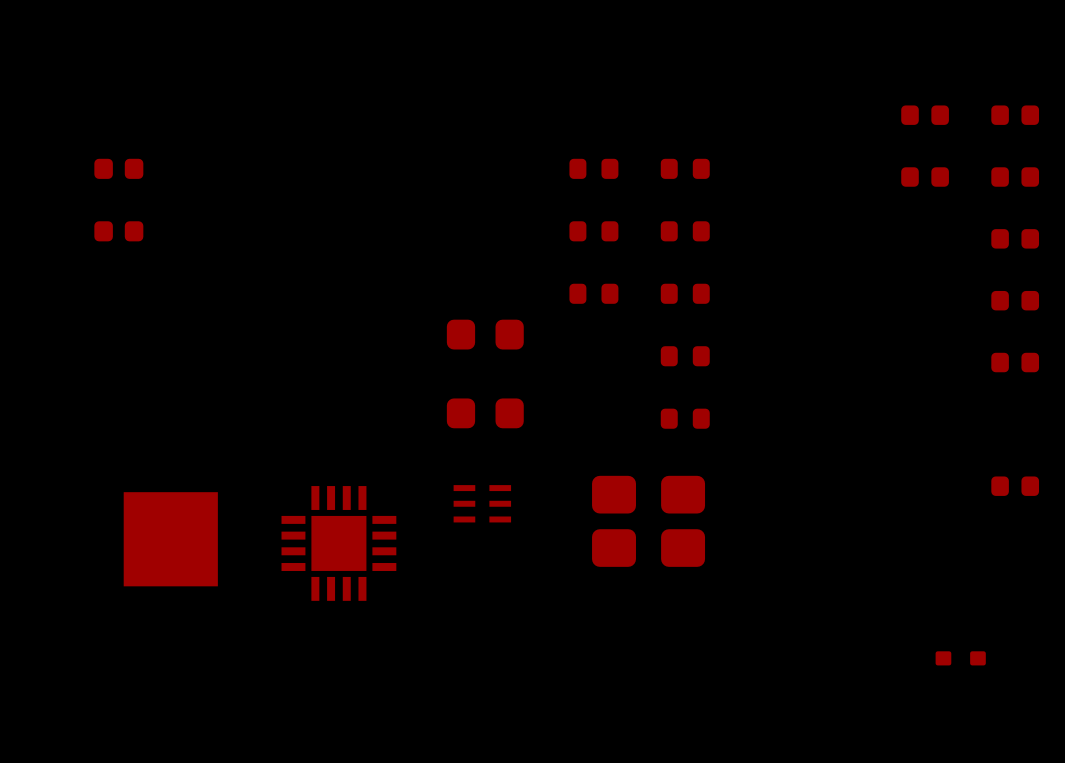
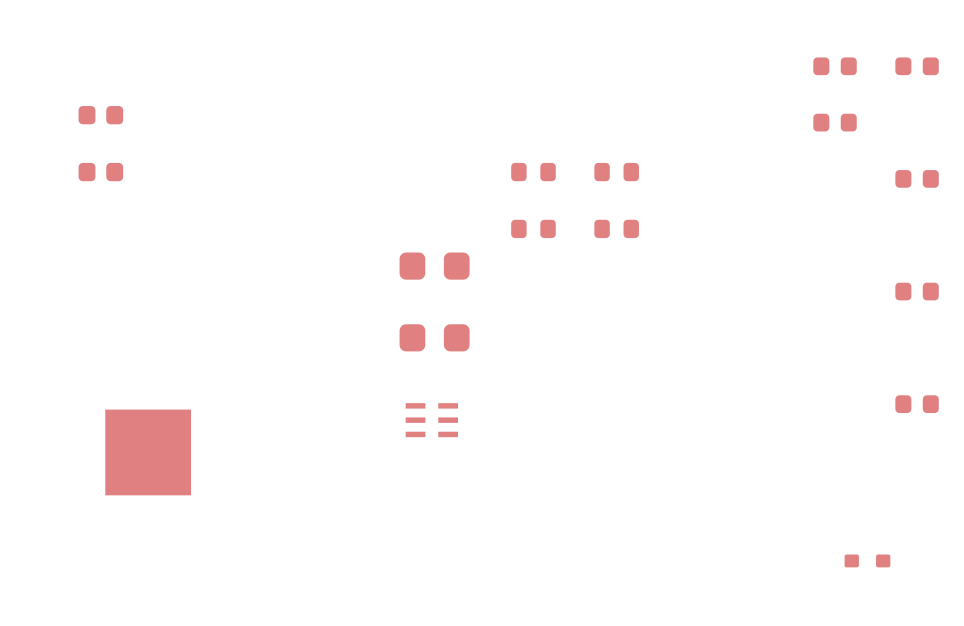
part: (593, 168) -> none
part: (685, 168) -> none
part: (1015, 177) -> none
part: (1015, 300) -> none
part: (685, 356) -> none
part: (685, 418) -> none
part: (648, 521) -> none
part: (338, 543) -> none

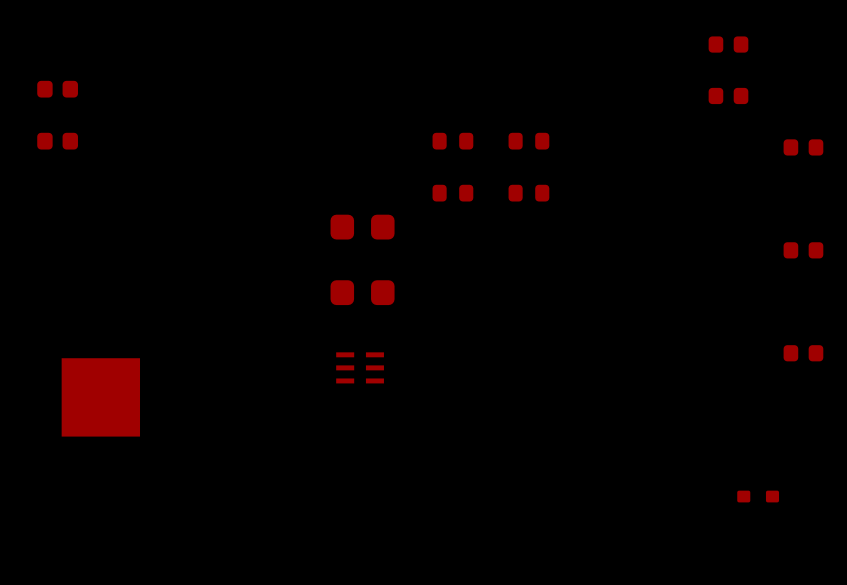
part: (917, 66) -> none

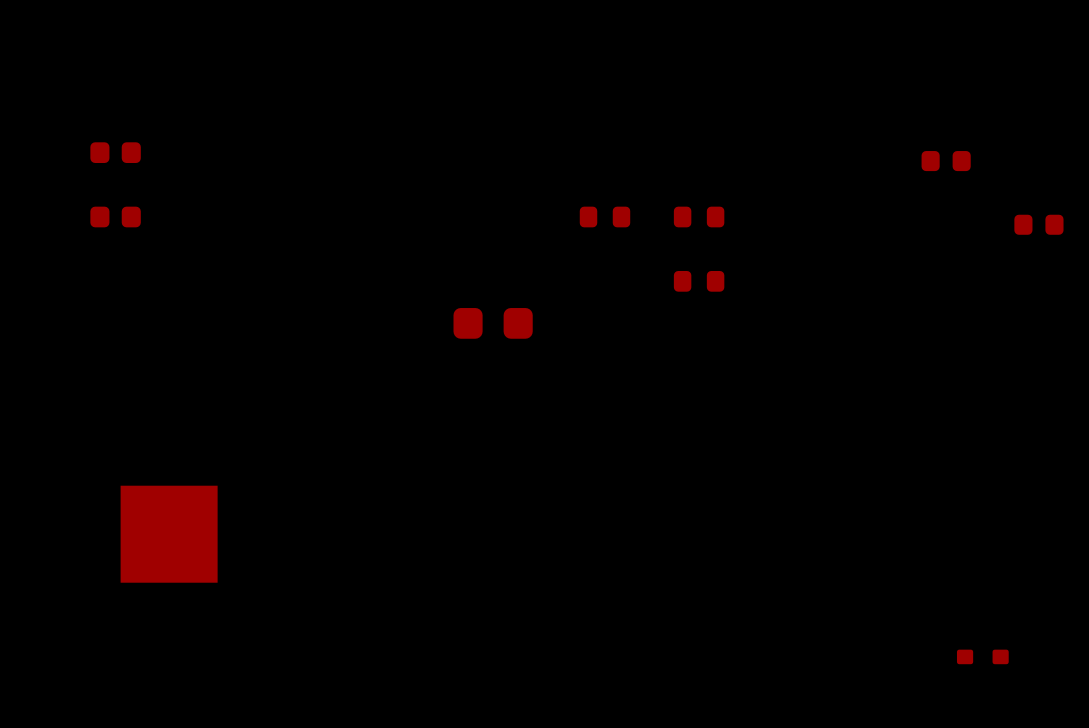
part: (728, 44) -> none
part: (452, 193) -> none
part: (803, 250) -> none
part: (362, 292) -> none
part: (803, 353) -> none
part: (360, 367) -> none

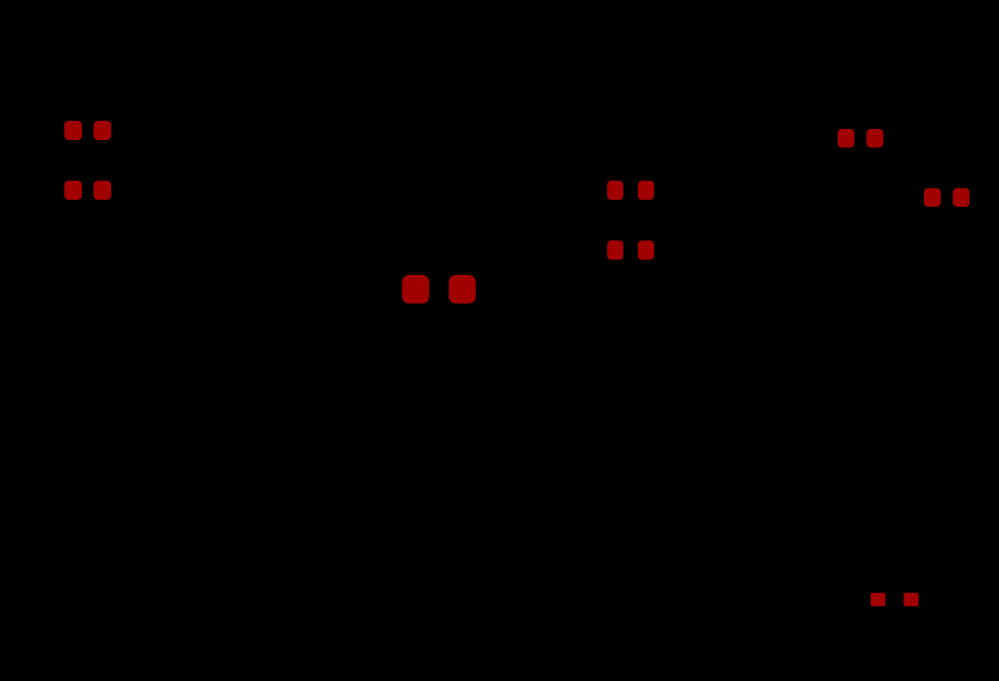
part: (605, 217) -> none
part: (169, 534) -> none

